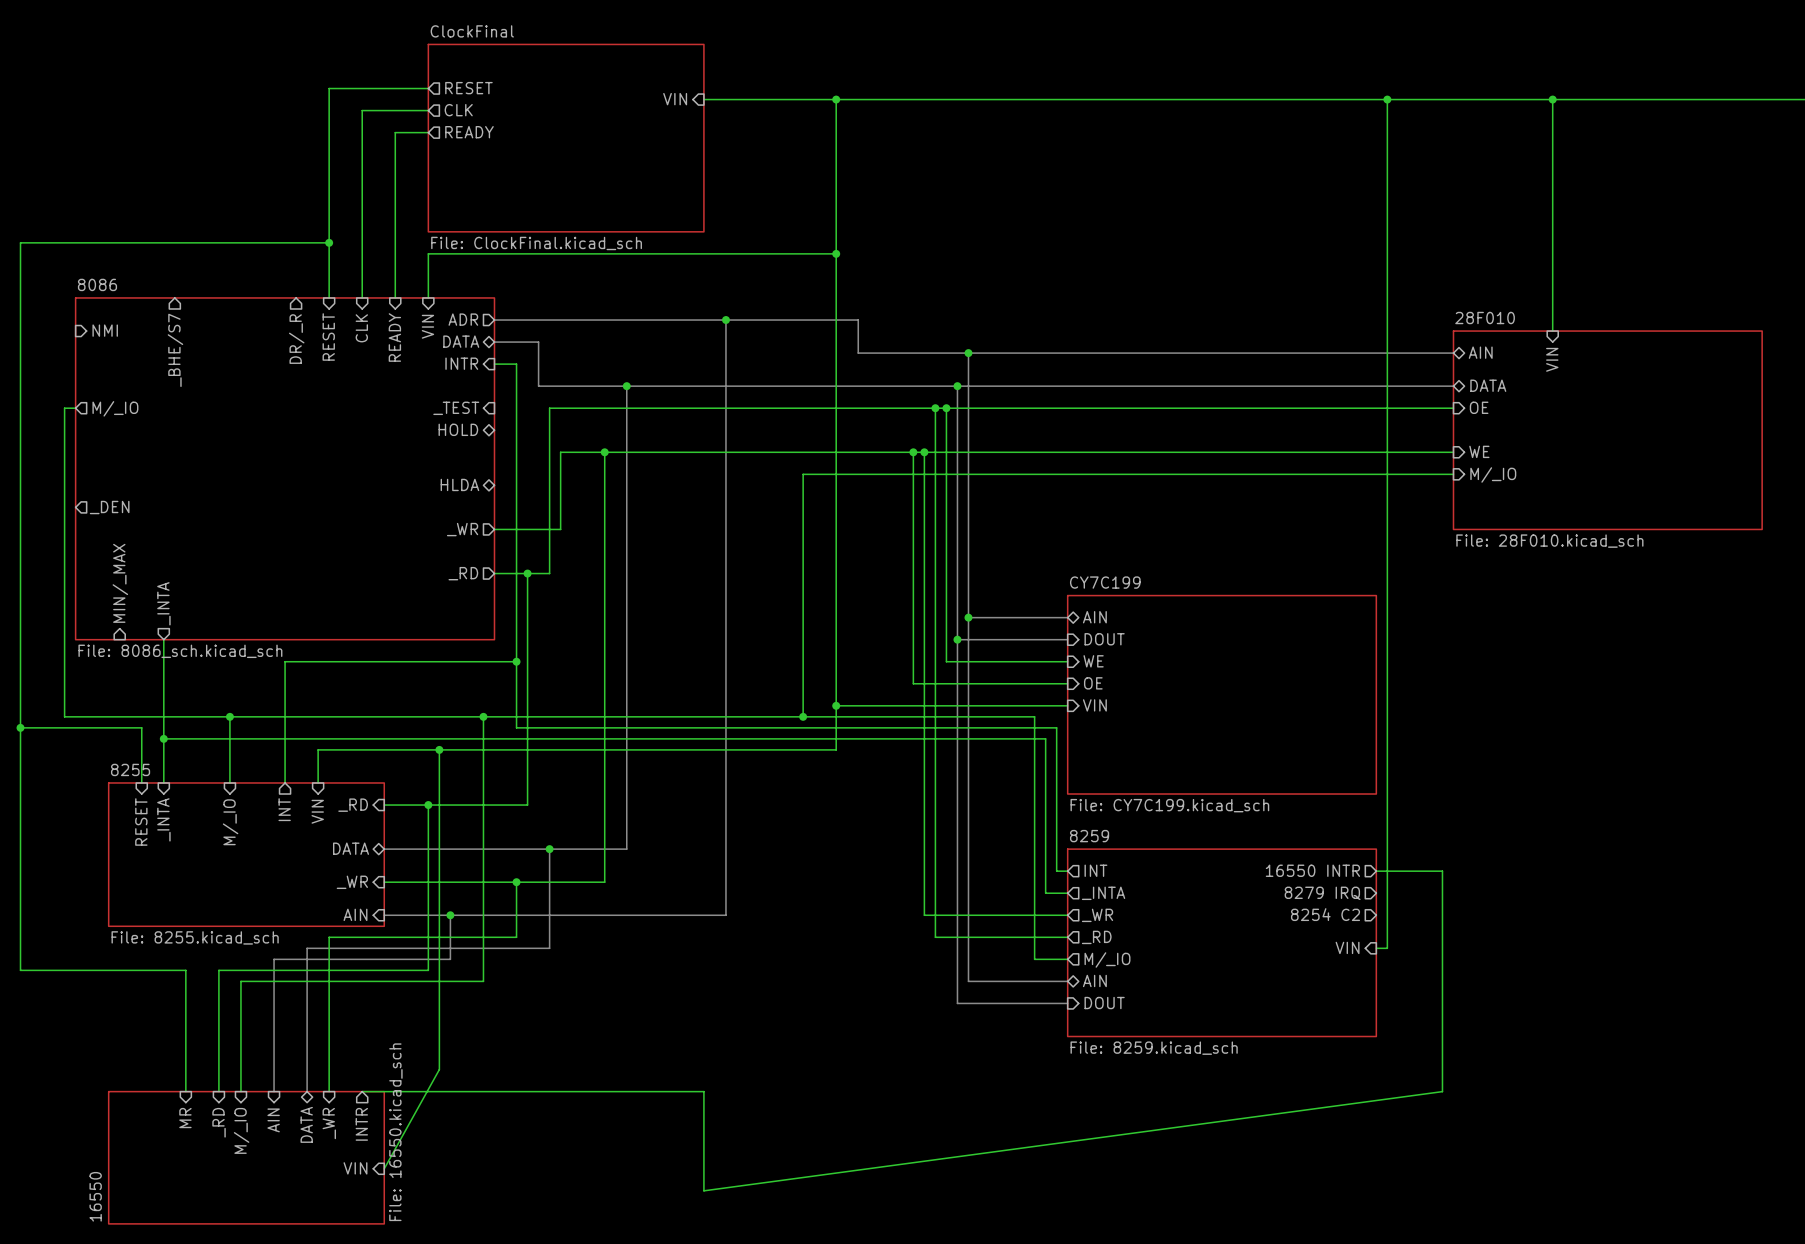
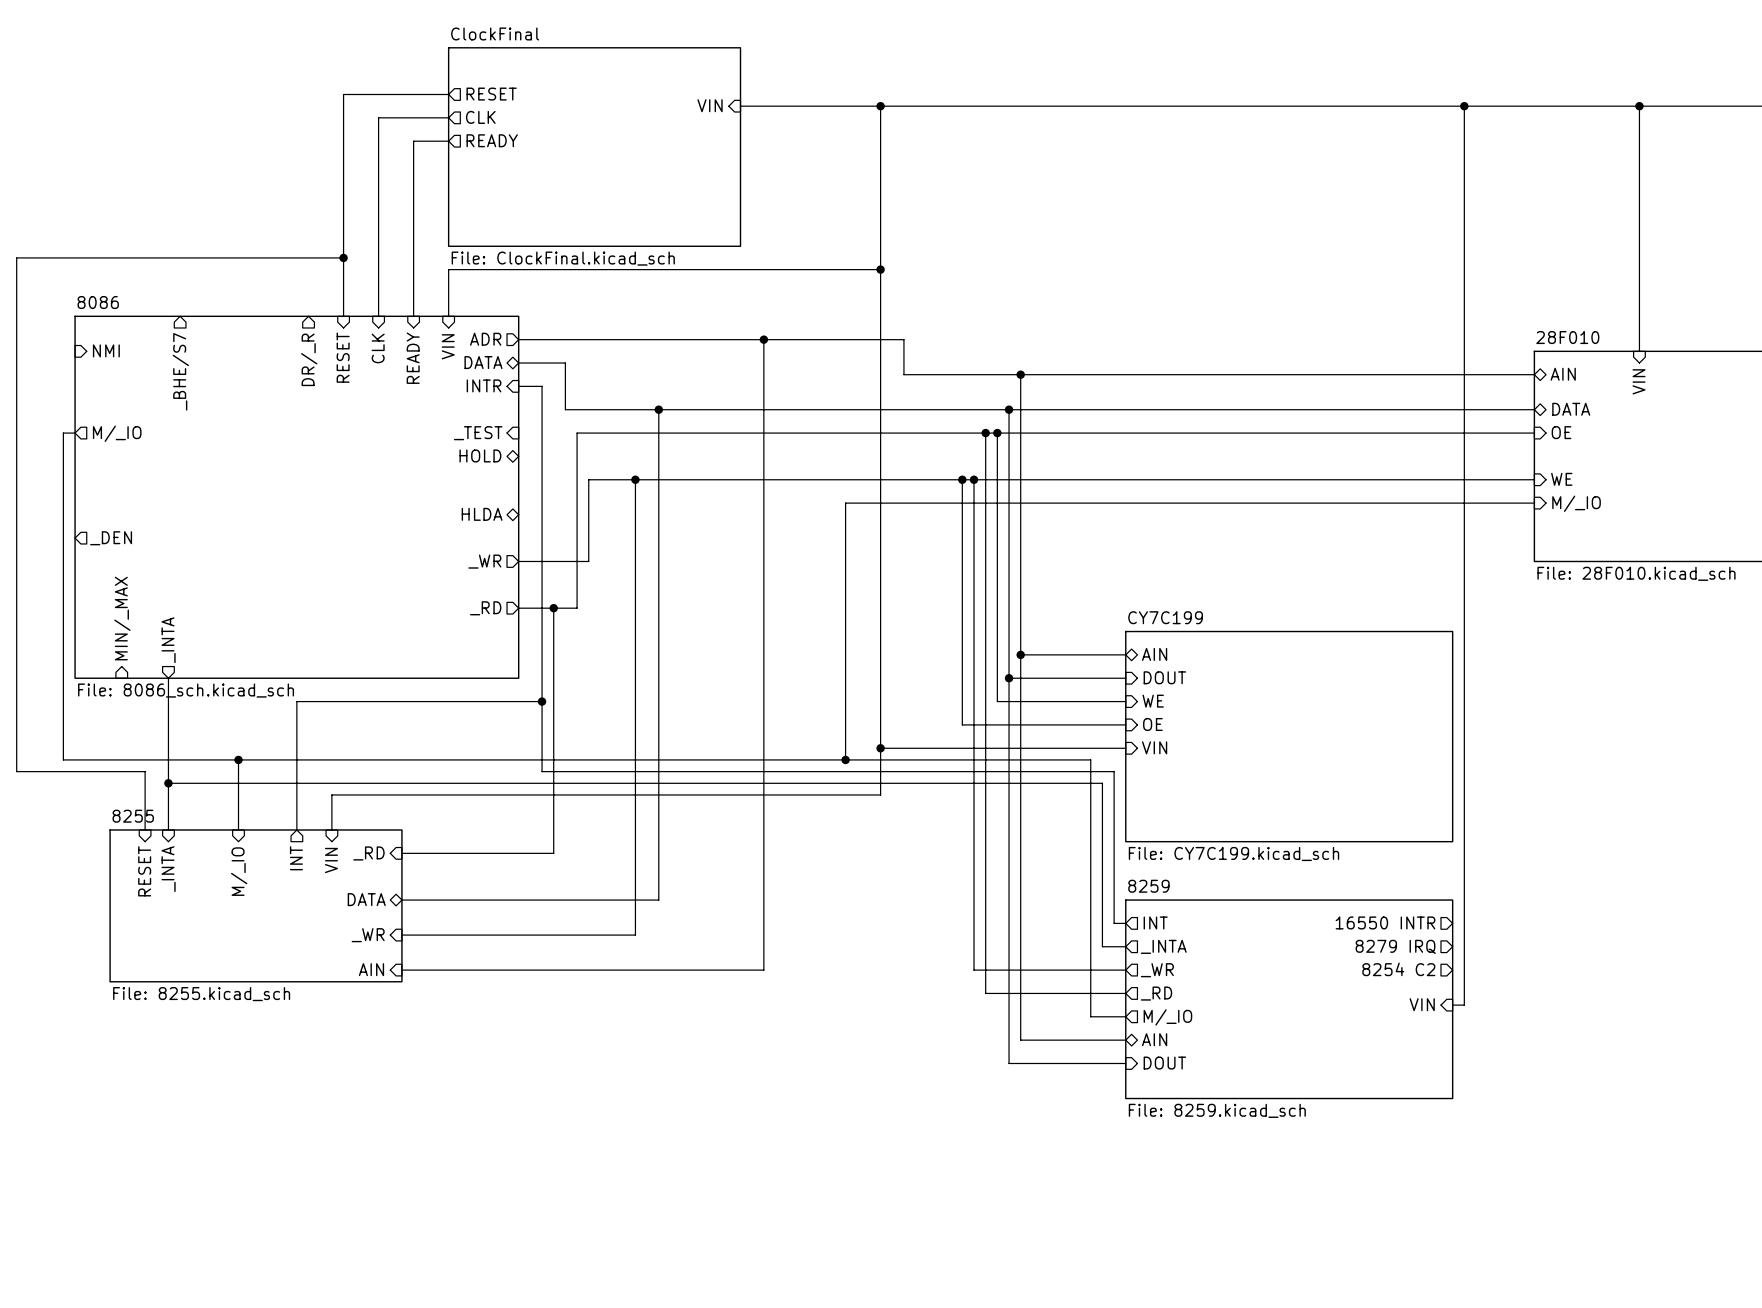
wire: (483, 716) (483, 981) (240, 981) (240, 1091) -> none
junction: (483, 716) -> none
wire: (20, 727) (20, 970) (185, 970) (185, 1091) -> none
junction: (20, 727) -> none
wire: (439, 749) (439, 1069) (384, 1168) -> none
junction: (439, 749) -> none
wire: (428, 805) (428, 970) (218, 970) (218, 1091) -> none
junction: (428, 805) -> none
bus: (549, 849) (549, 948) (307, 948) (307, 1091) -> none
junction: (549, 849) -> none
wire: (1376, 871) (1442, 871) (1442, 1091) (703, 1190) (703, 1091) (362, 1091) -> none
wire: (516, 882) (516, 937) (329, 937) (329, 1091) -> none
junction: (516, 882) -> none
bus: (450, 915) (450, 959) (274, 959) (274, 1091) -> none
junction: (450, 915) -> none
sheet pin: MR (185, 1118) -> none
sheet pin: AIN (273, 1120) -> none
sheet pin: _RD (219, 1122) -> none
sheet pin: _WR (329, 1123) -> none
sheet pin: DATA (306, 1124) -> none
sheet pin: INTR (361, 1124) -> none
sheet pin: M/_IO (241, 1130) -> none
sheet 16550: File: 16550.kicad_sch (246, 1157) -> none
sheet pin: VIN (355, 1168) -> none

